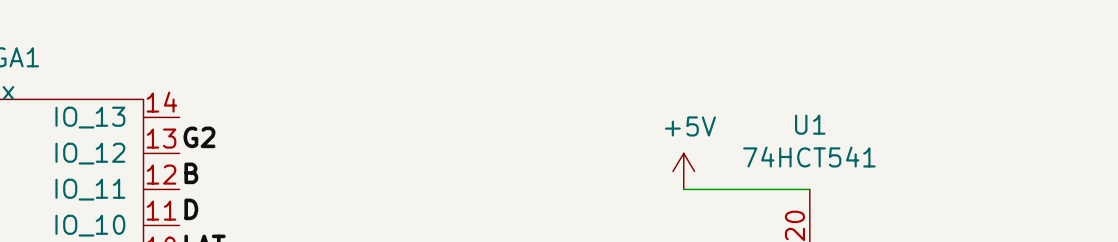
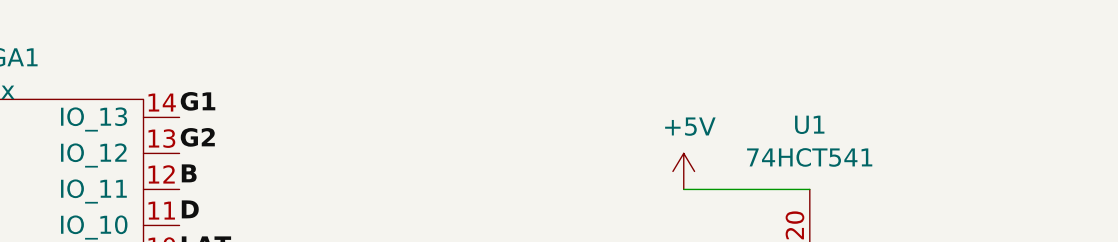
label: none -> G1 (198, 101)

